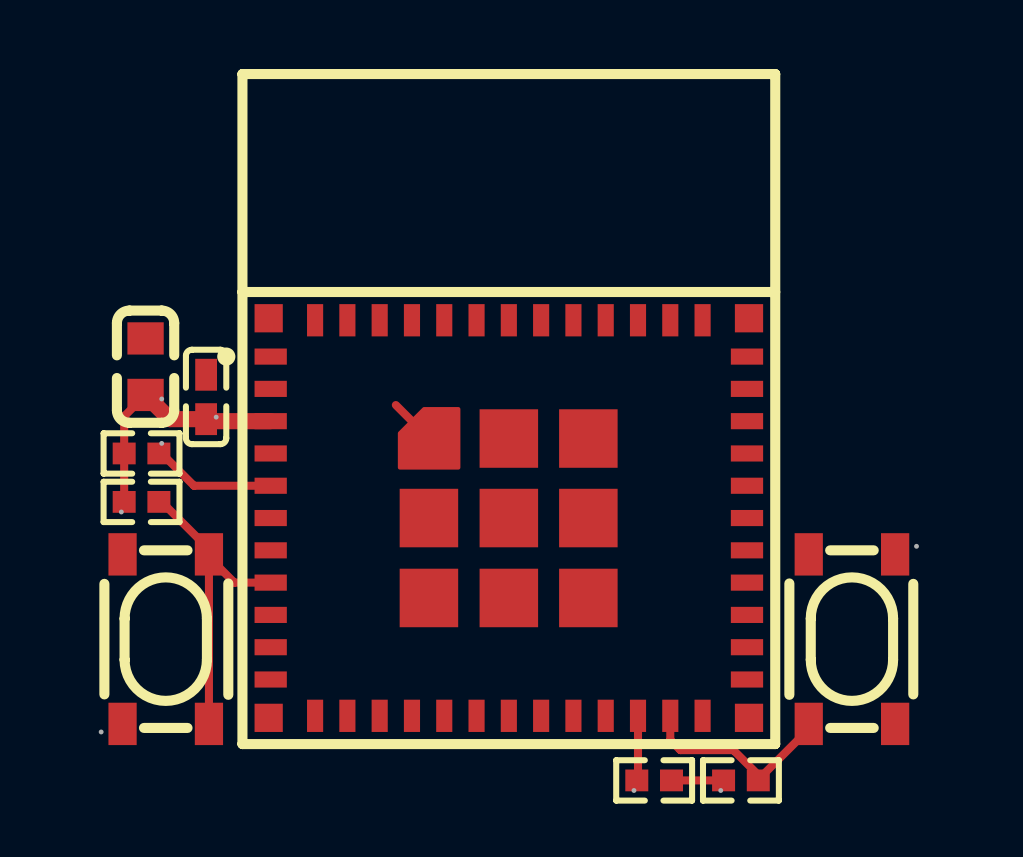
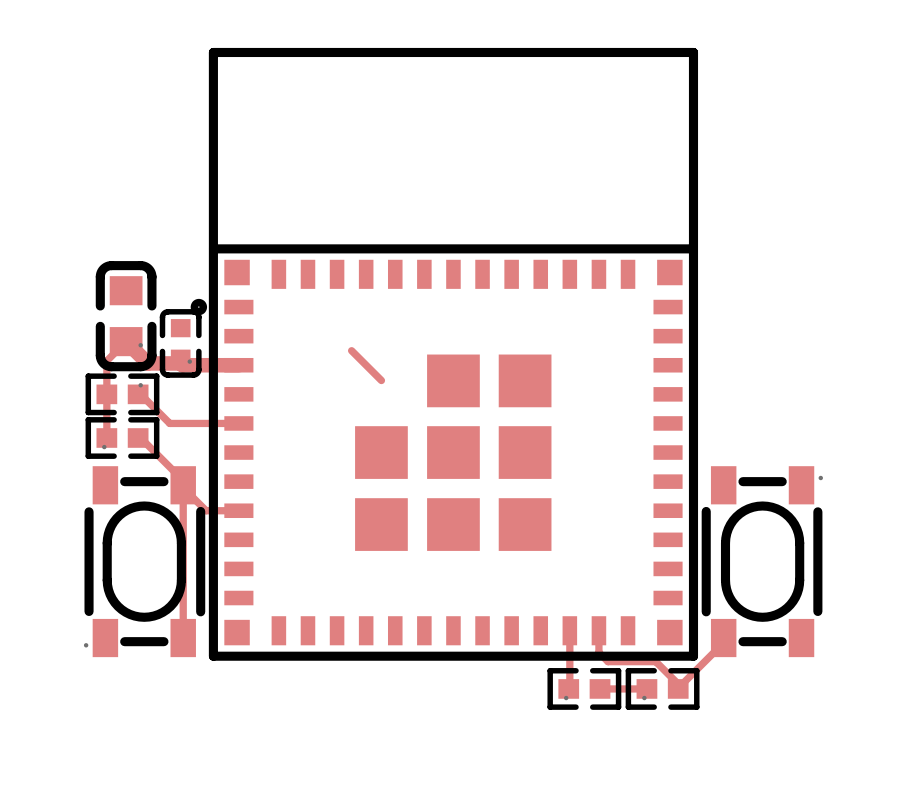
part footprint: [217, 68, 781, 750] -> [190, 47, 699, 661]
part footprint: [182, 346, 230, 448] -> [159, 309, 202, 378]

